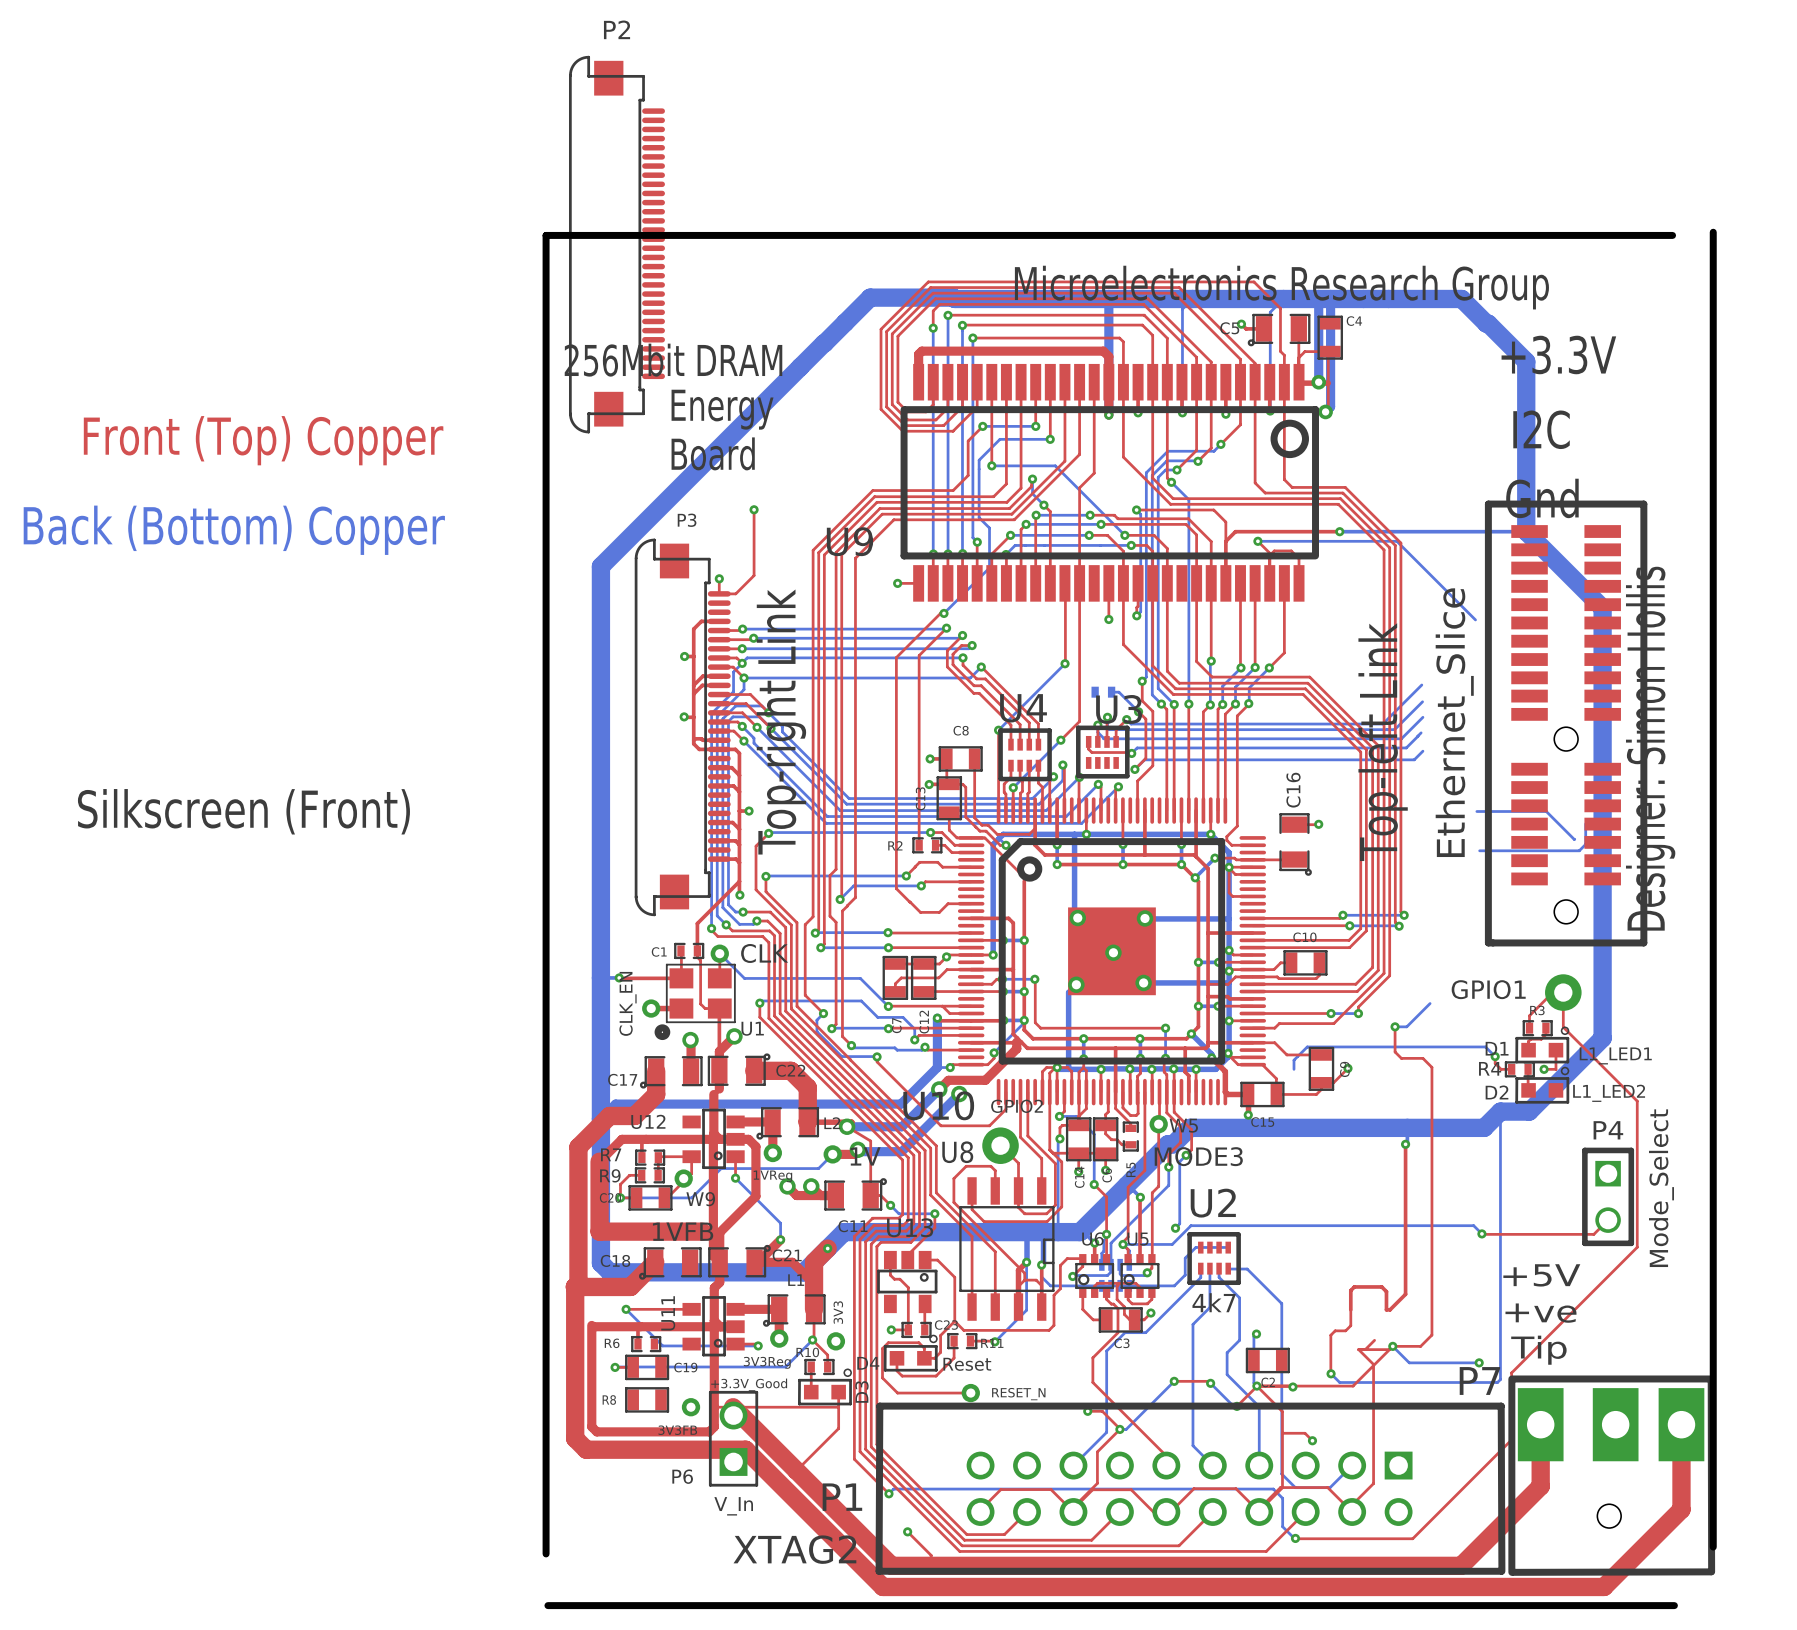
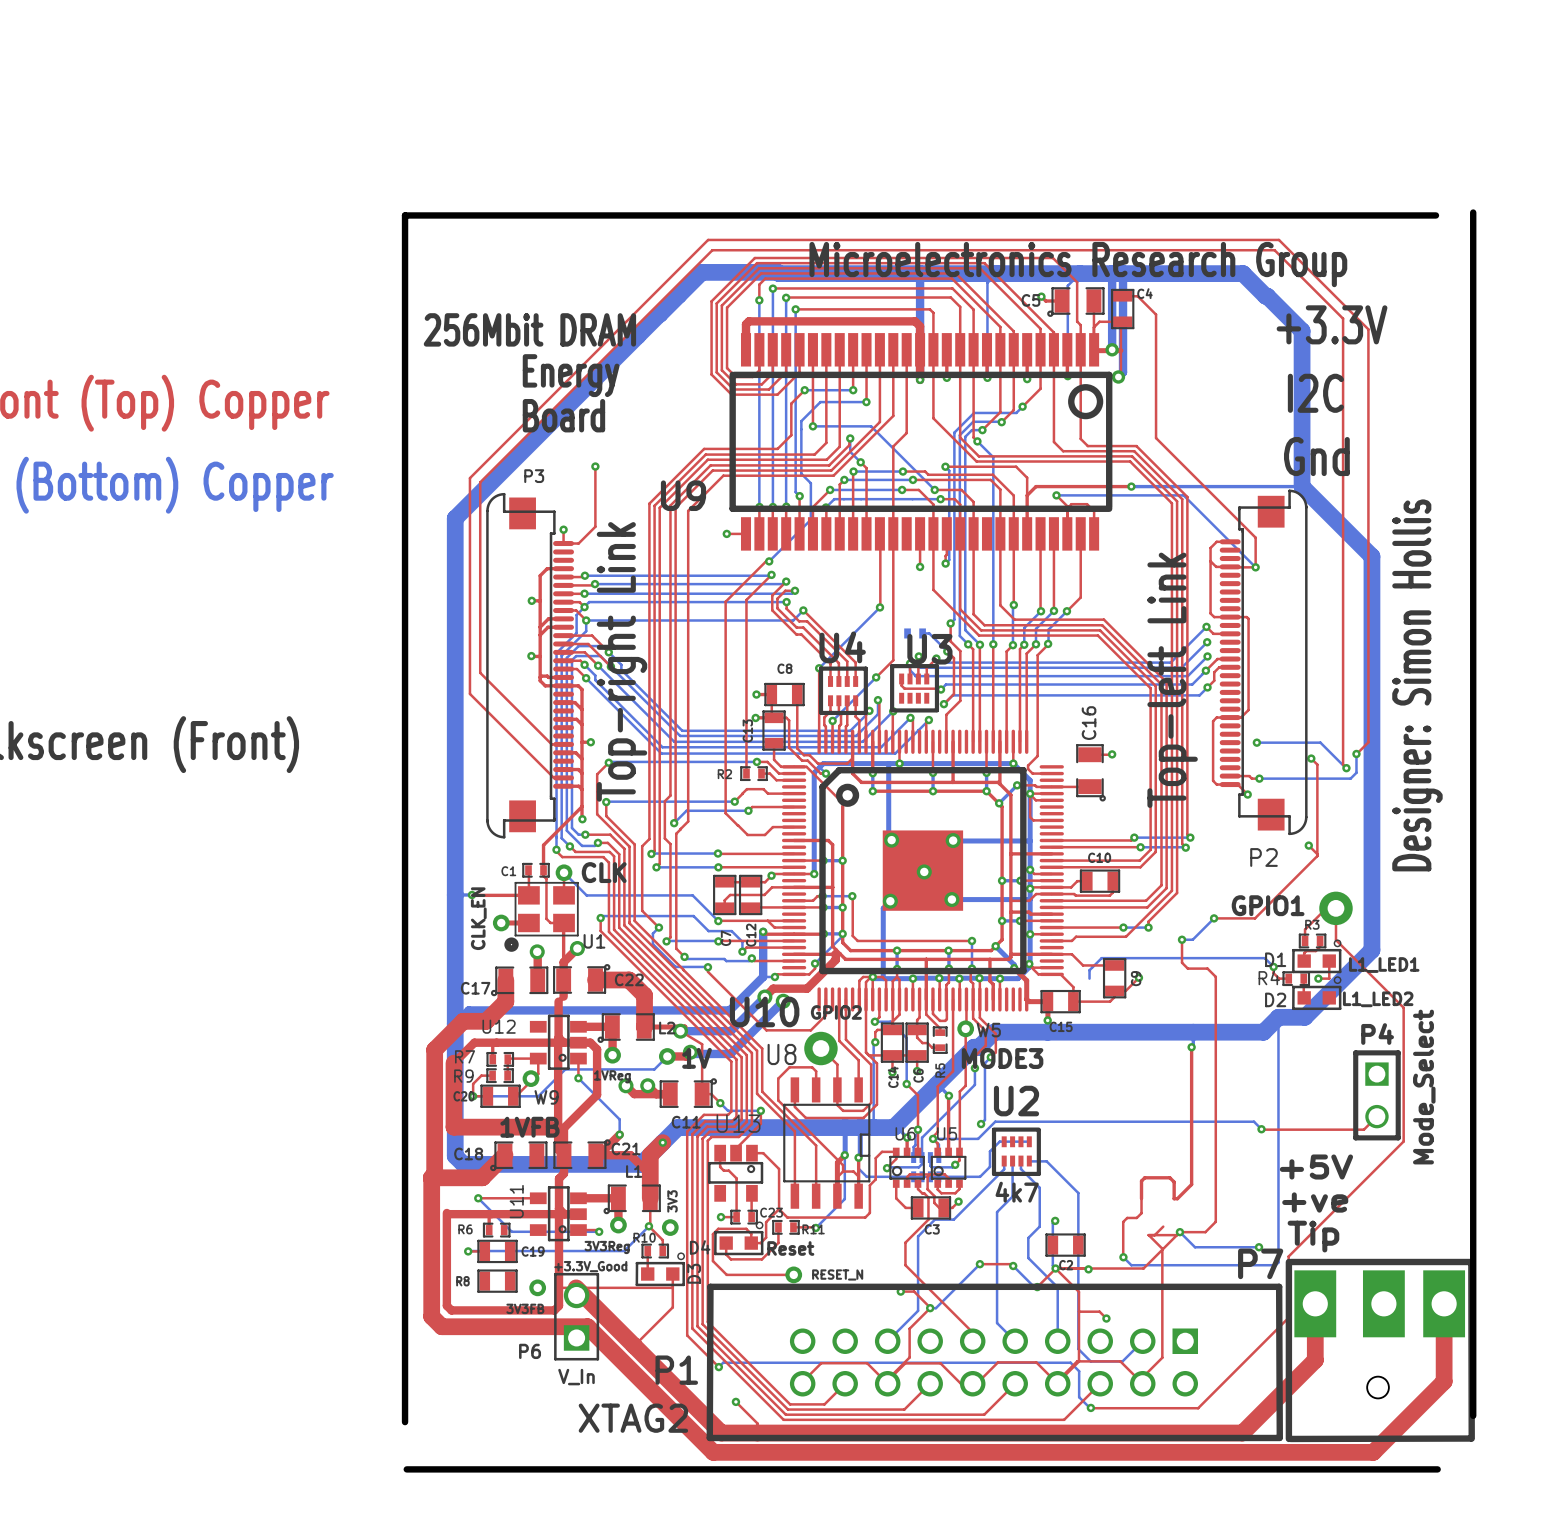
P2 rotation: 0° (617, 244) -> 180° (1263, 662)
P2 position: (617, 244) -> (1263, 662)
top track: none -> (1122, 296) (1137, 296) (1156, 314) (1156, 438) (1255, 537) (1255, 567) (1216, 566) (1210, 561)
top track: none -> (1230, 541) (1216, 541) (1210, 548) (1210, 613) (1214, 617) (1246, 617) (1248, 618) (1248, 710) (1241, 717) (1216, 717) (1213, 721) (1213, 780) (1216, 784) (1237, 784) (1247, 794)
via: none -> (1255, 567)
top track: none -> (1206, 626) (1213, 633) (1230, 633)
via: none -> (1206, 626)
via: none -> (1207, 642)
via: none -> (1207, 656)
top track: none -> (1230, 659) (1217, 659) (1205, 670)
part: Ethernet_Slice (1566, 723) -> none
top track: none -> (1230, 667) (1219, 667) (1214, 672) (1214, 680) (1207, 687)
via: none -> (1205, 670)
via: none -> (1207, 687)
via: none -> (1256, 742)
top track: none -> (563, 744) (551, 744) (480, 672) (480, 482) (712, 250) (1274, 250) (1343, 318) (1343, 764) (1346, 768)
via: none -> (1356, 753)
top track: none -> (1356, 753) (1368, 742) (1368, 329) (1278, 239) (708, 239) (469, 478) (469, 693) (553, 777) (563, 777)
top track: none -> (1311, 758) (1317, 764) (1317, 856) (1255, 918) (1214, 918)
via: none -> (1311, 758)
via: none -> (1346, 768)
top track: none -> (1230, 776) (1249, 776) (1251, 778) (1259, 778)
via: none -> (1259, 778)
via: none -> (1247, 794)
top track: none -> (1308, 845) (1317, 854)
via: none -> (1308, 845)
via: none -> (1214, 918)

